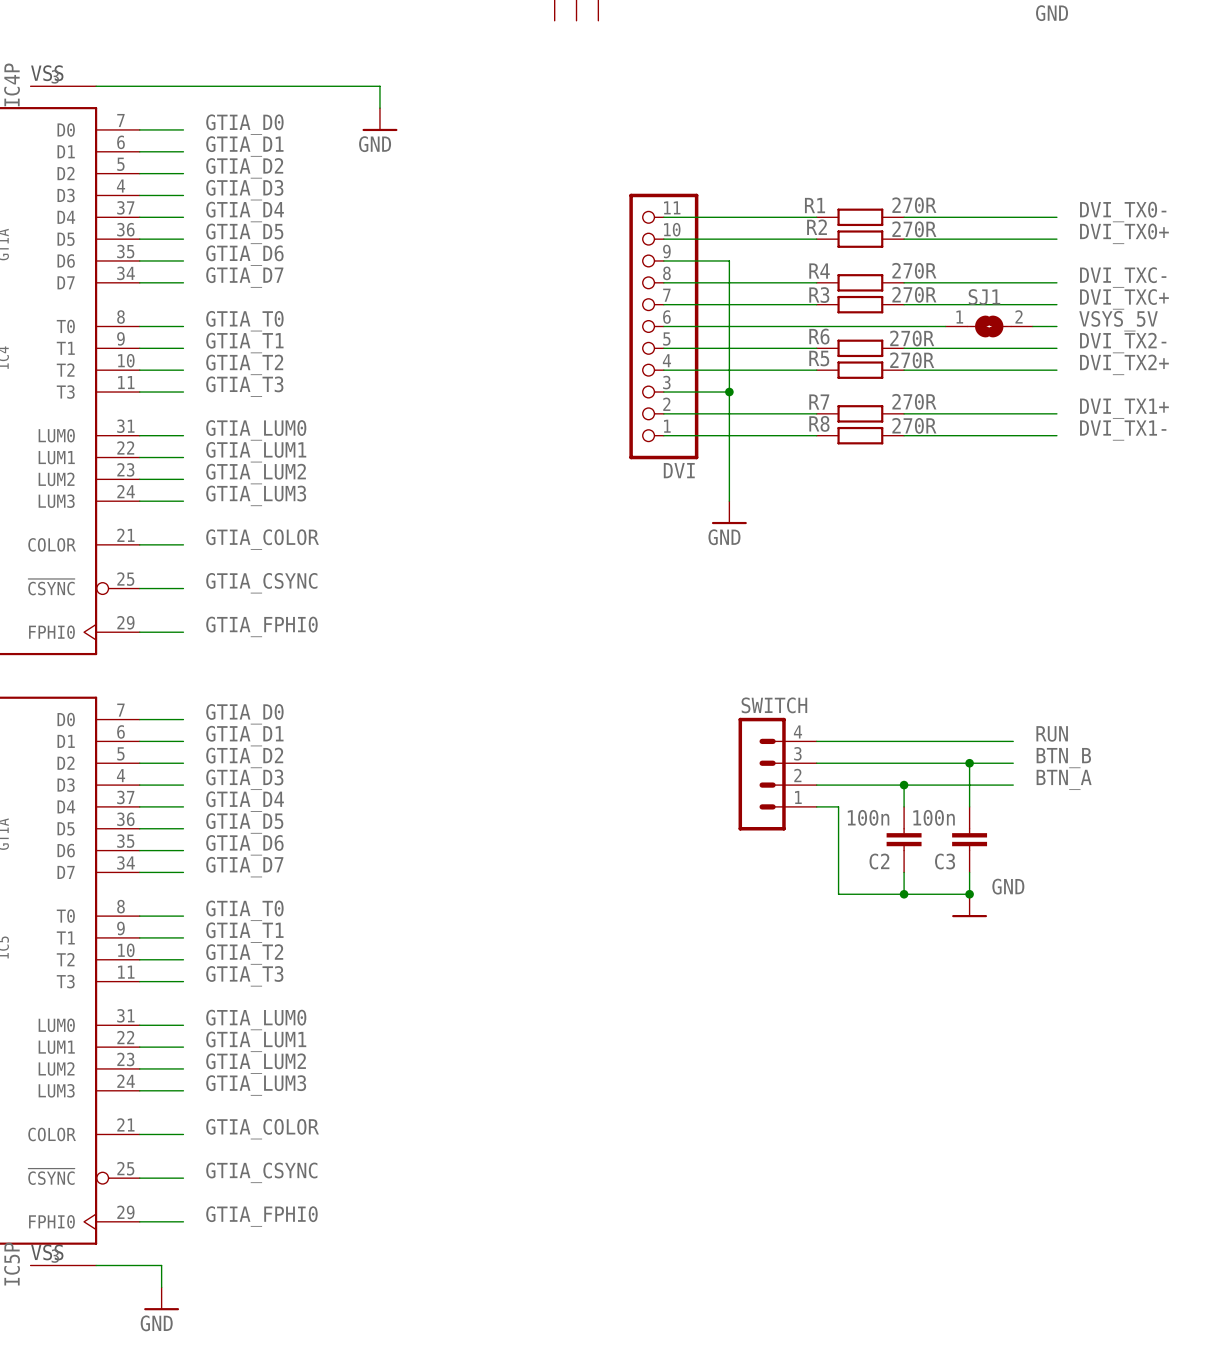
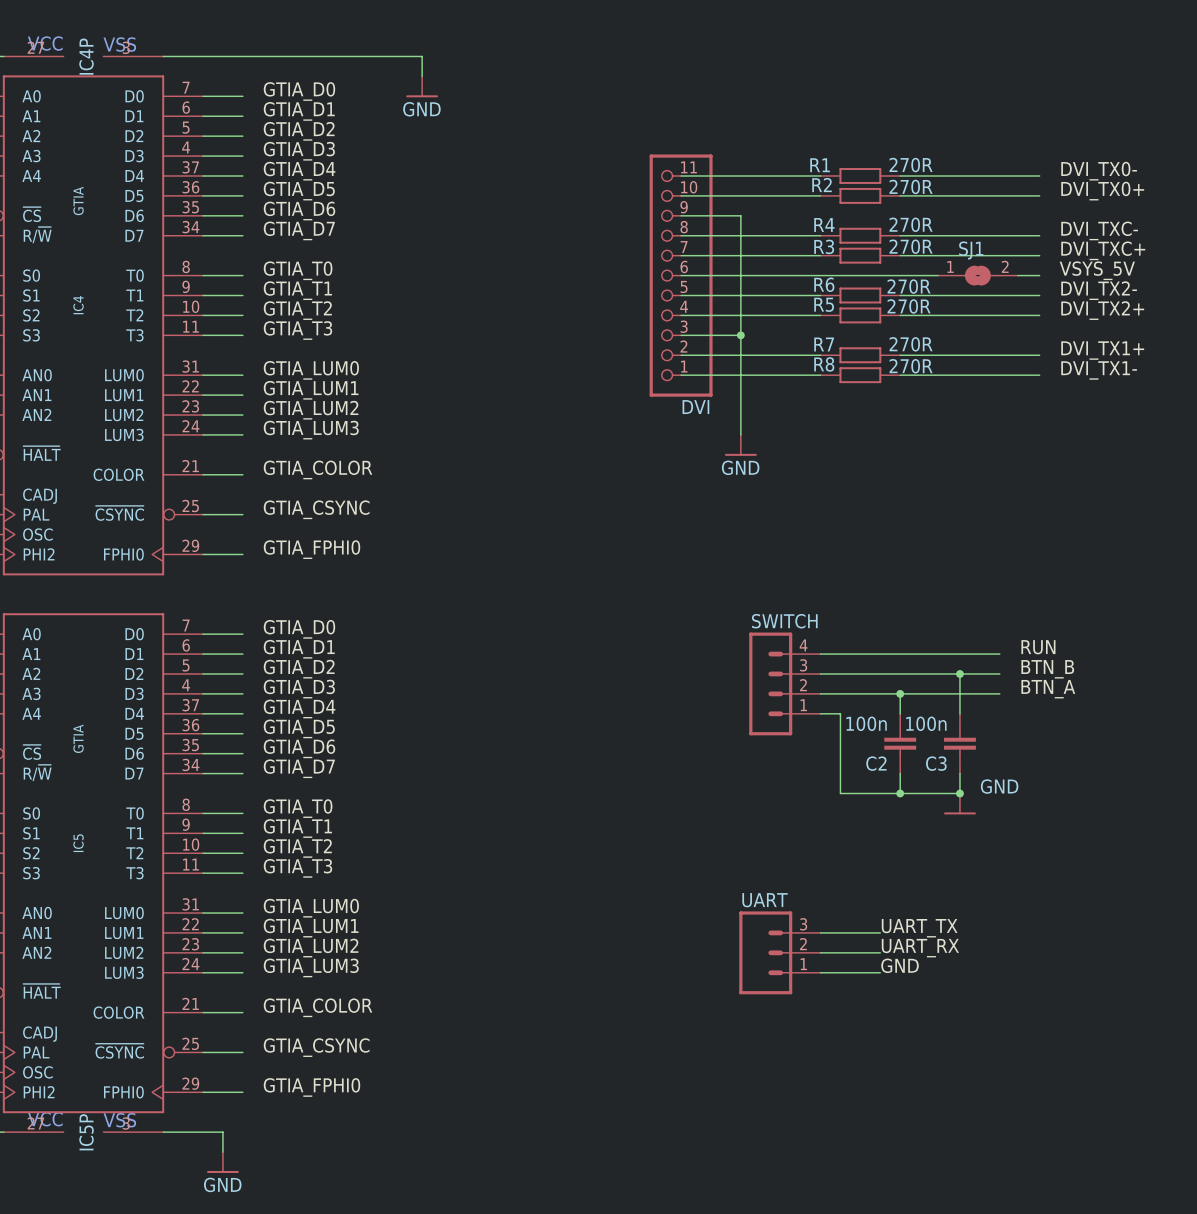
label: none -> UART_TX (919, 928)
wire: none -> (820, 932) (880, 932)
label: none -> UART_RX (920, 948)
UART: none -> (779, 952)
wire: none -> (820, 952) (880, 952)
label: none -> GND (900, 965)
wire: none -> (820, 972) (880, 972)

